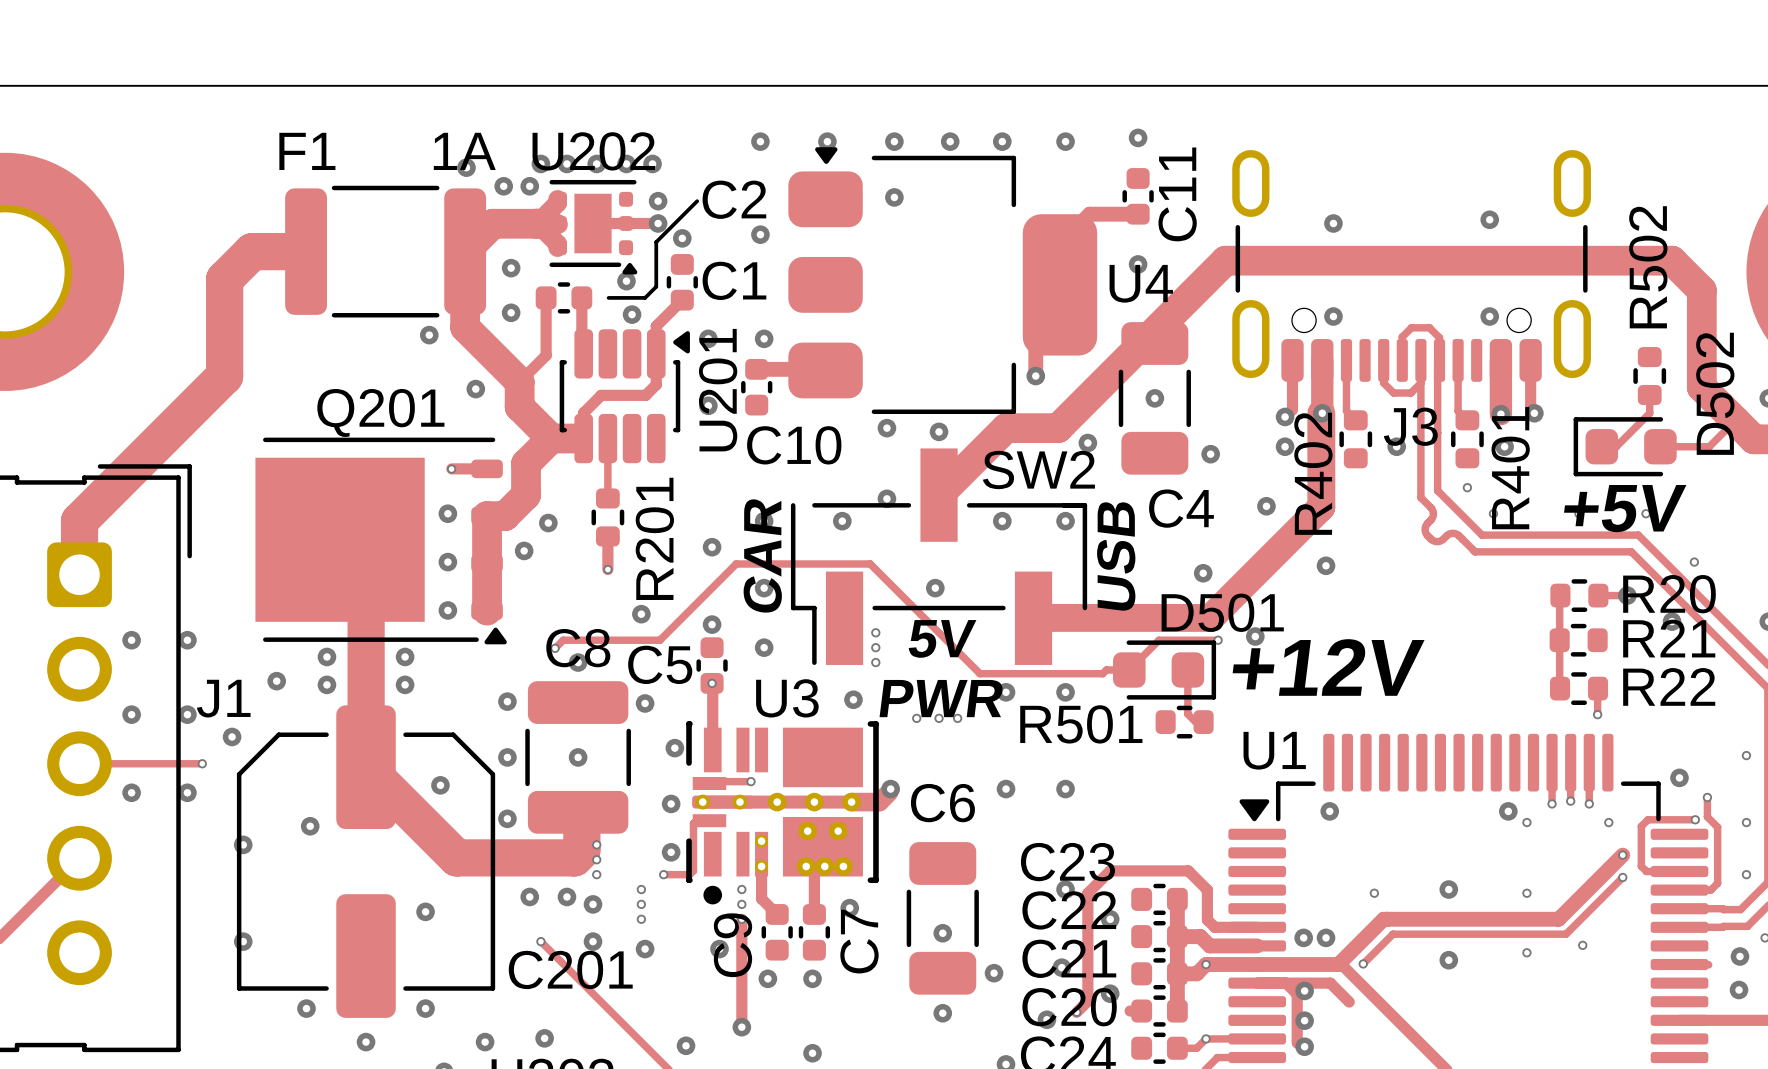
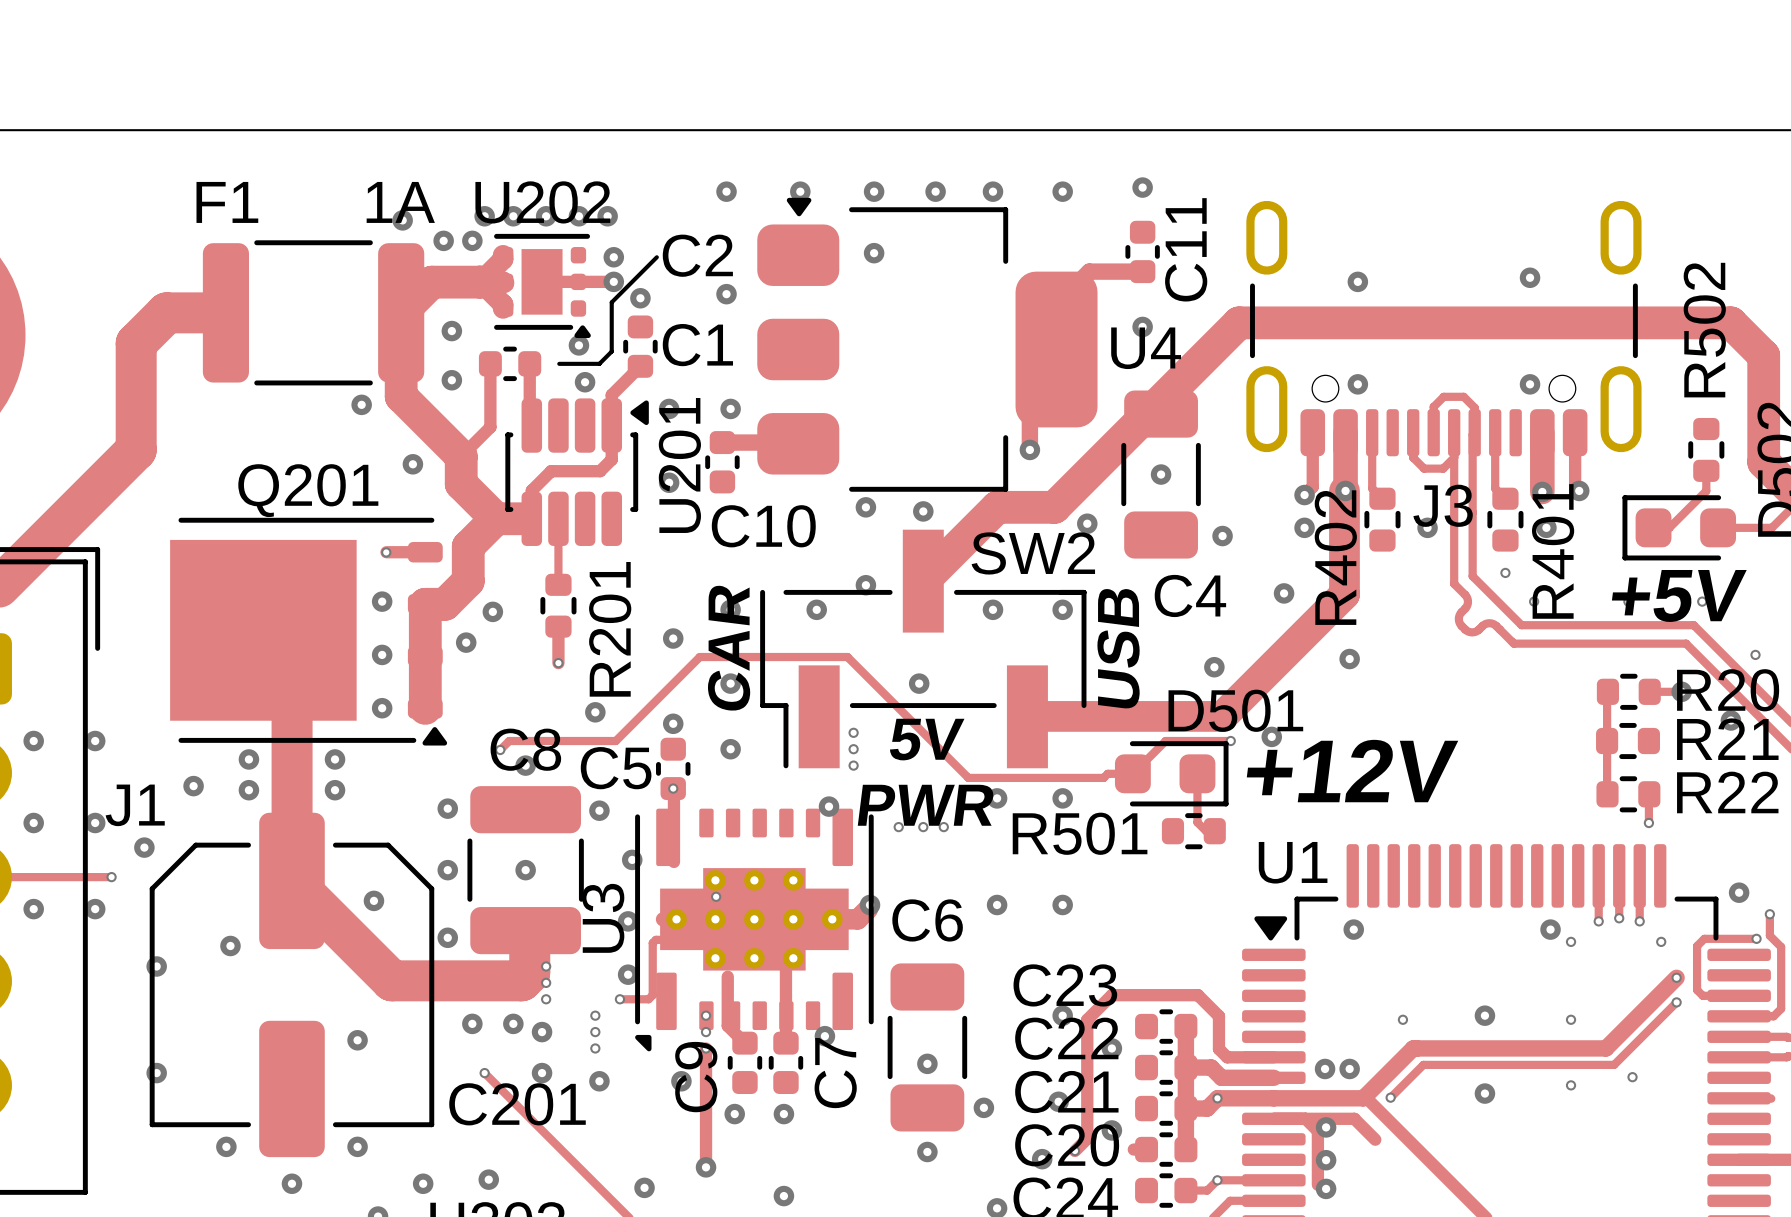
U3 name position: U3 (787, 698) -> U3 (603, 918)
U3 footprint: [686, 721, 879, 905] -> [635, 808, 874, 1052]

